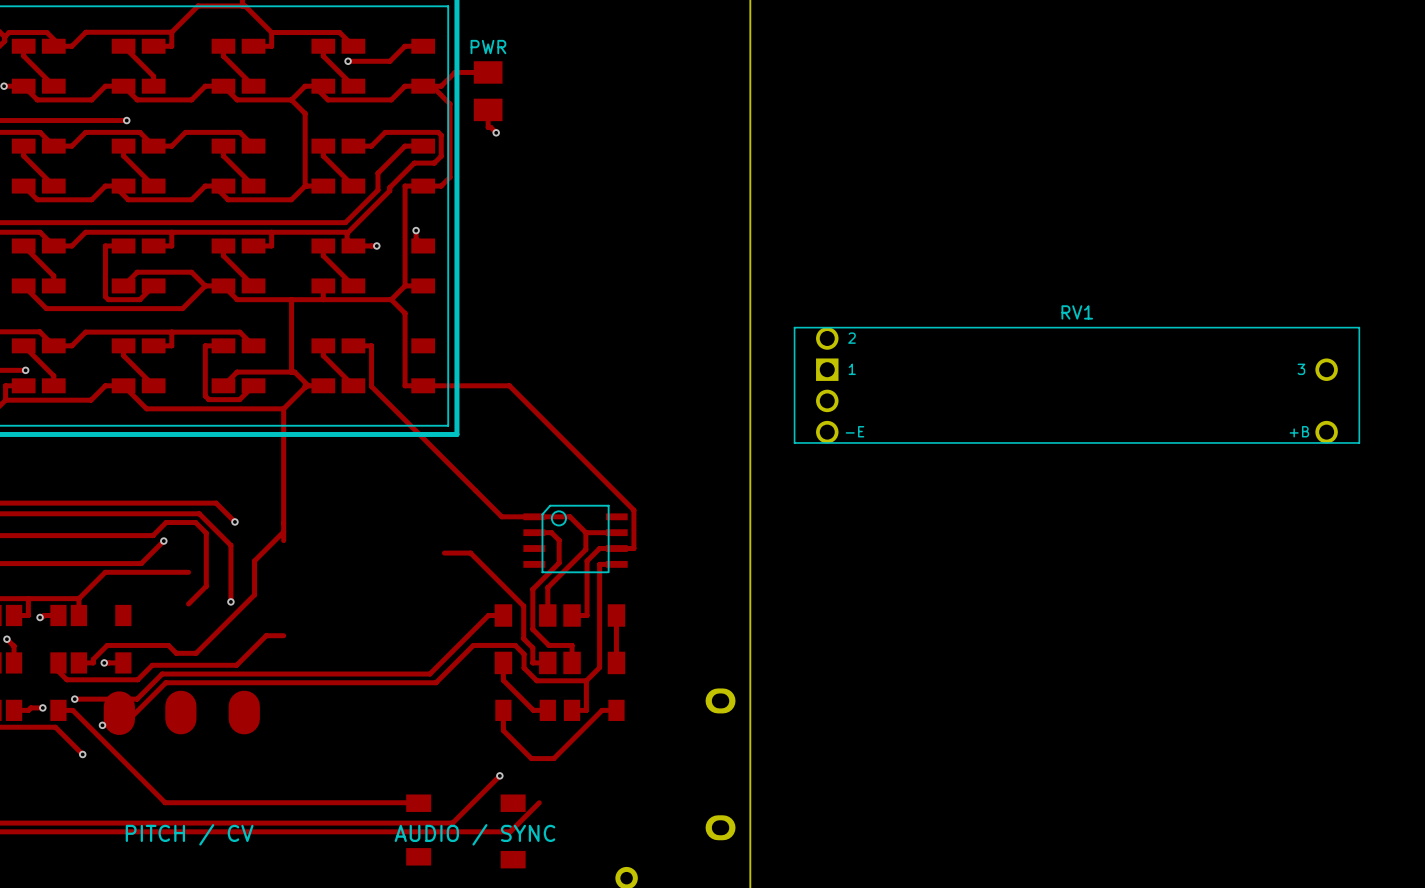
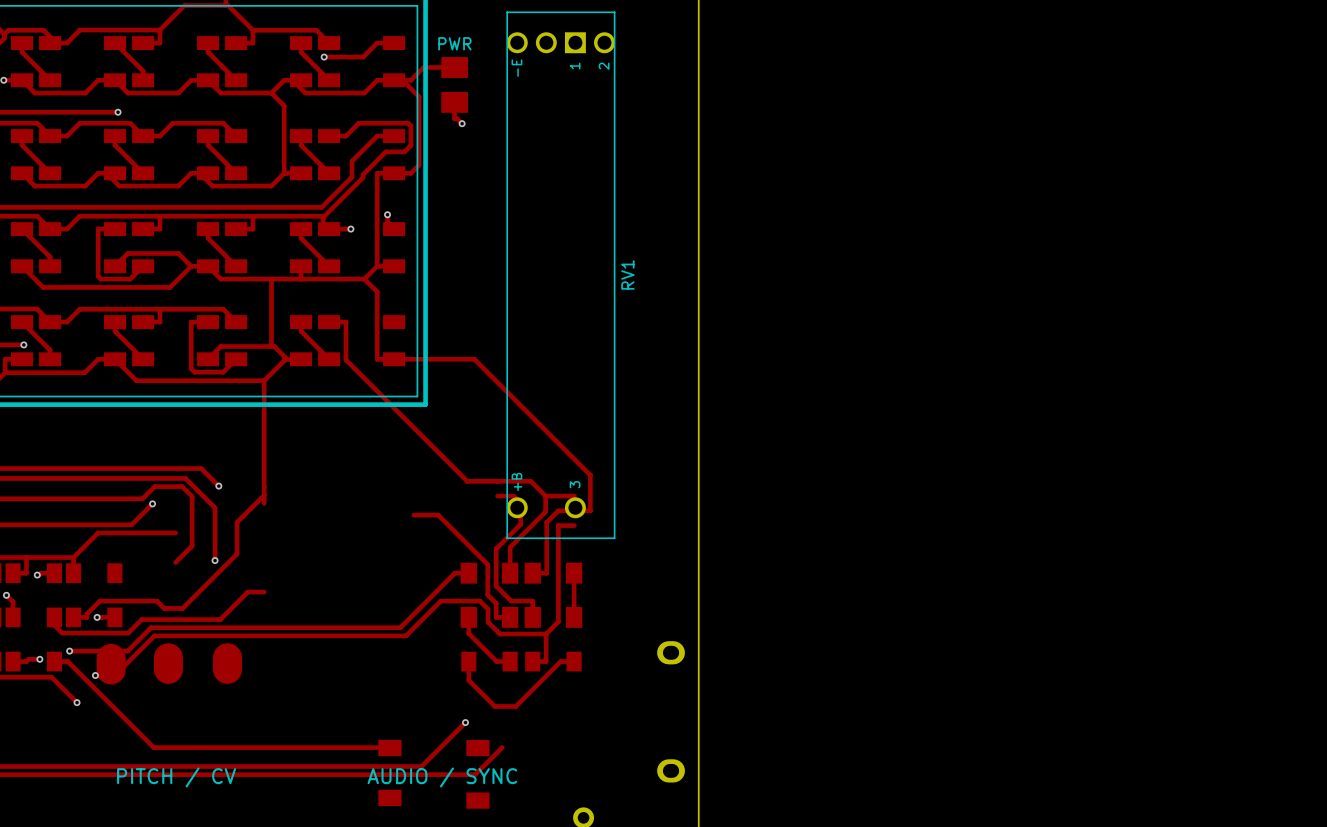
RV1 rotation: 0° (1076, 385) -> 90° clockwise (560, 275)
RV1 position: (1076, 385) -> (560, 275)
part: (575, 539) -> none

